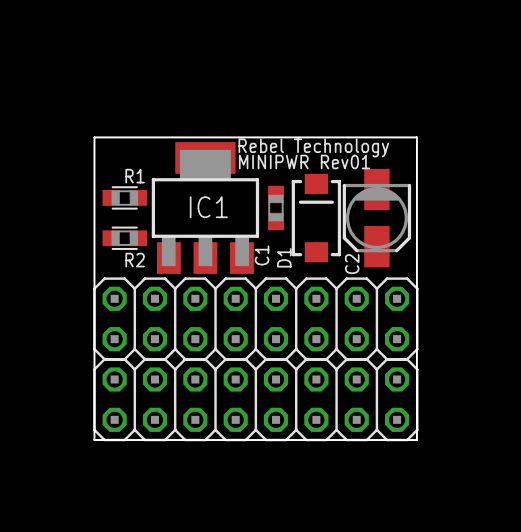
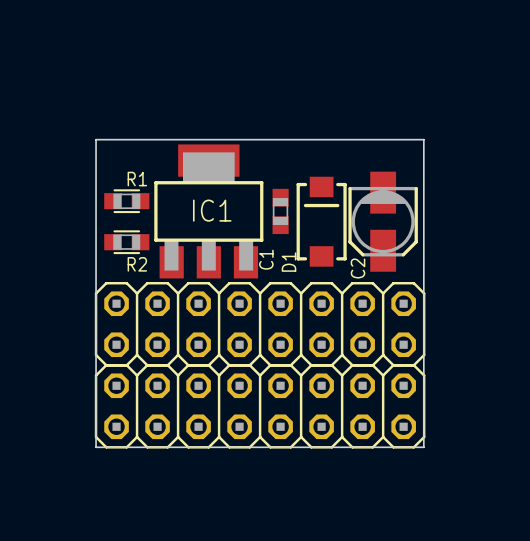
text: Rebel Technology (313, 147) -> none
text: MINIPWR Rev01 (304, 161) -> none

